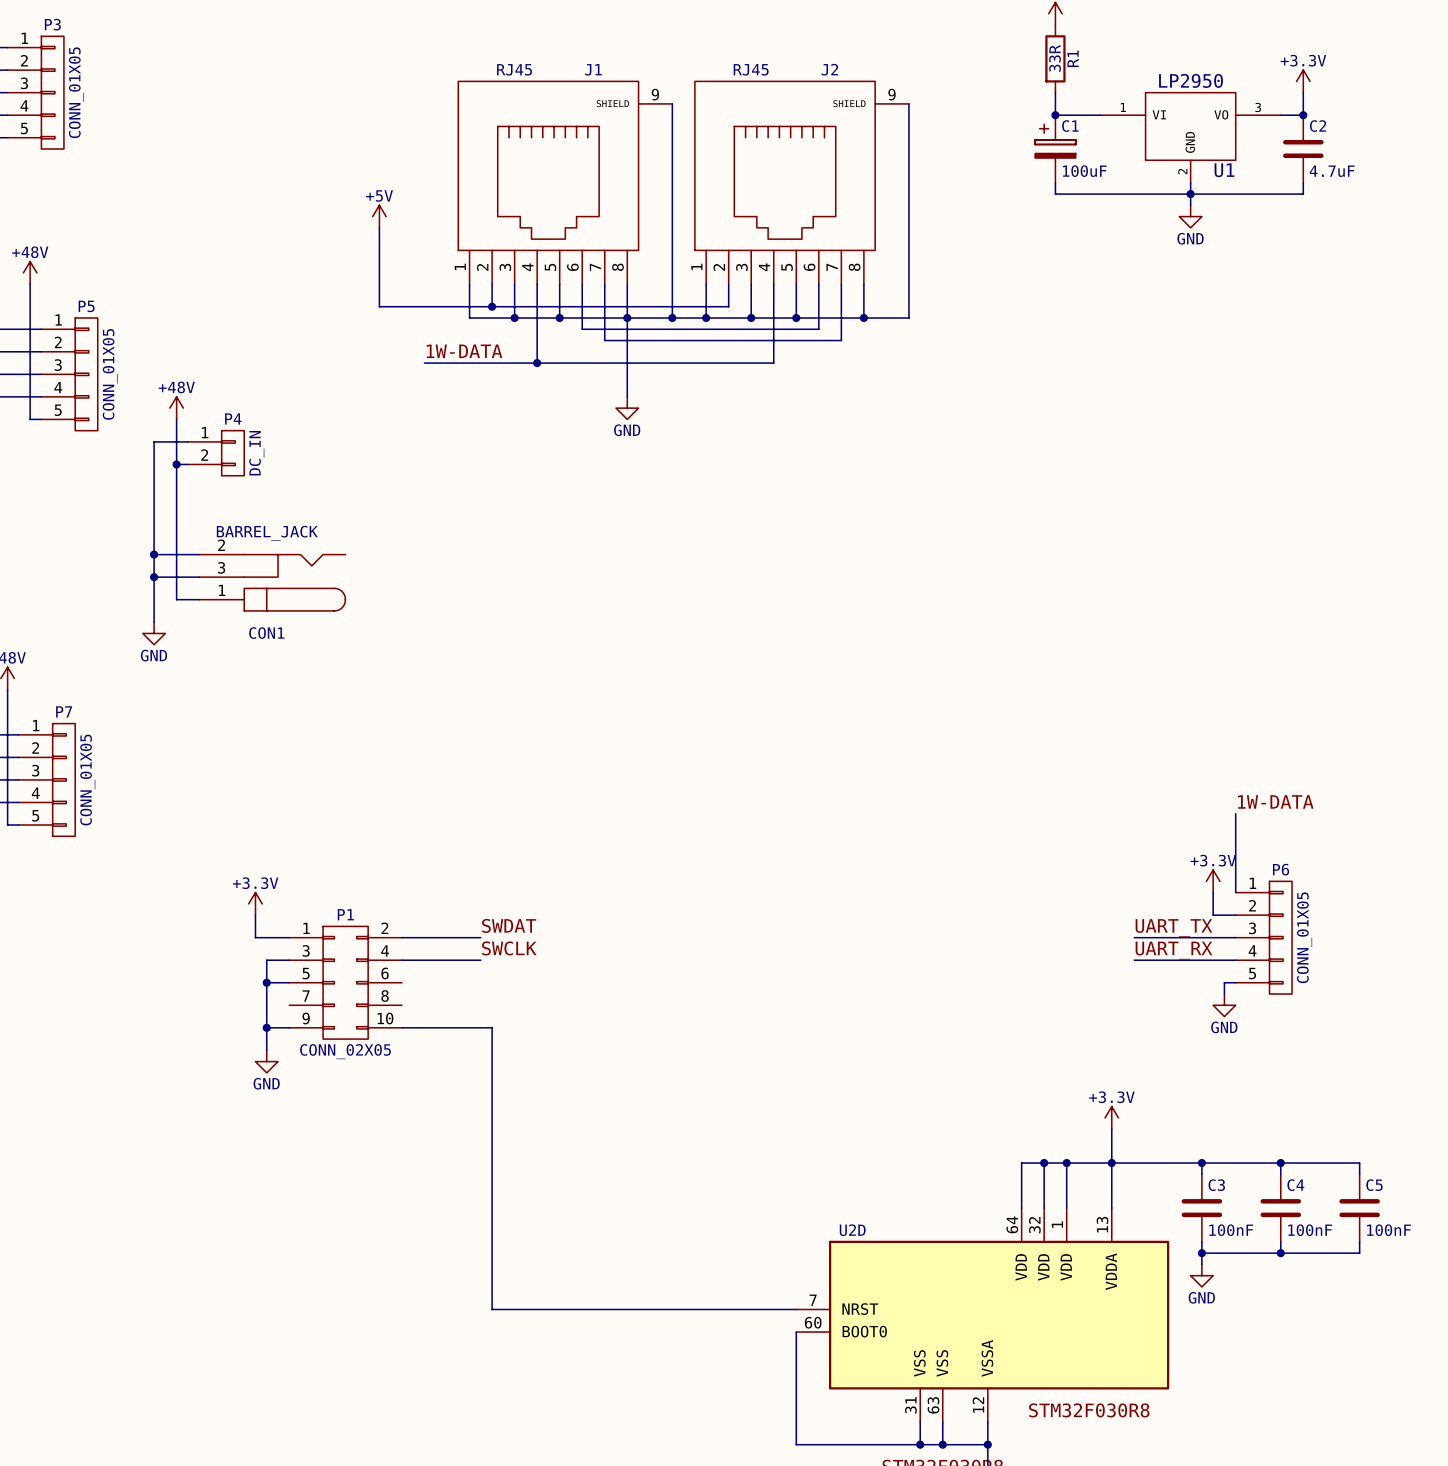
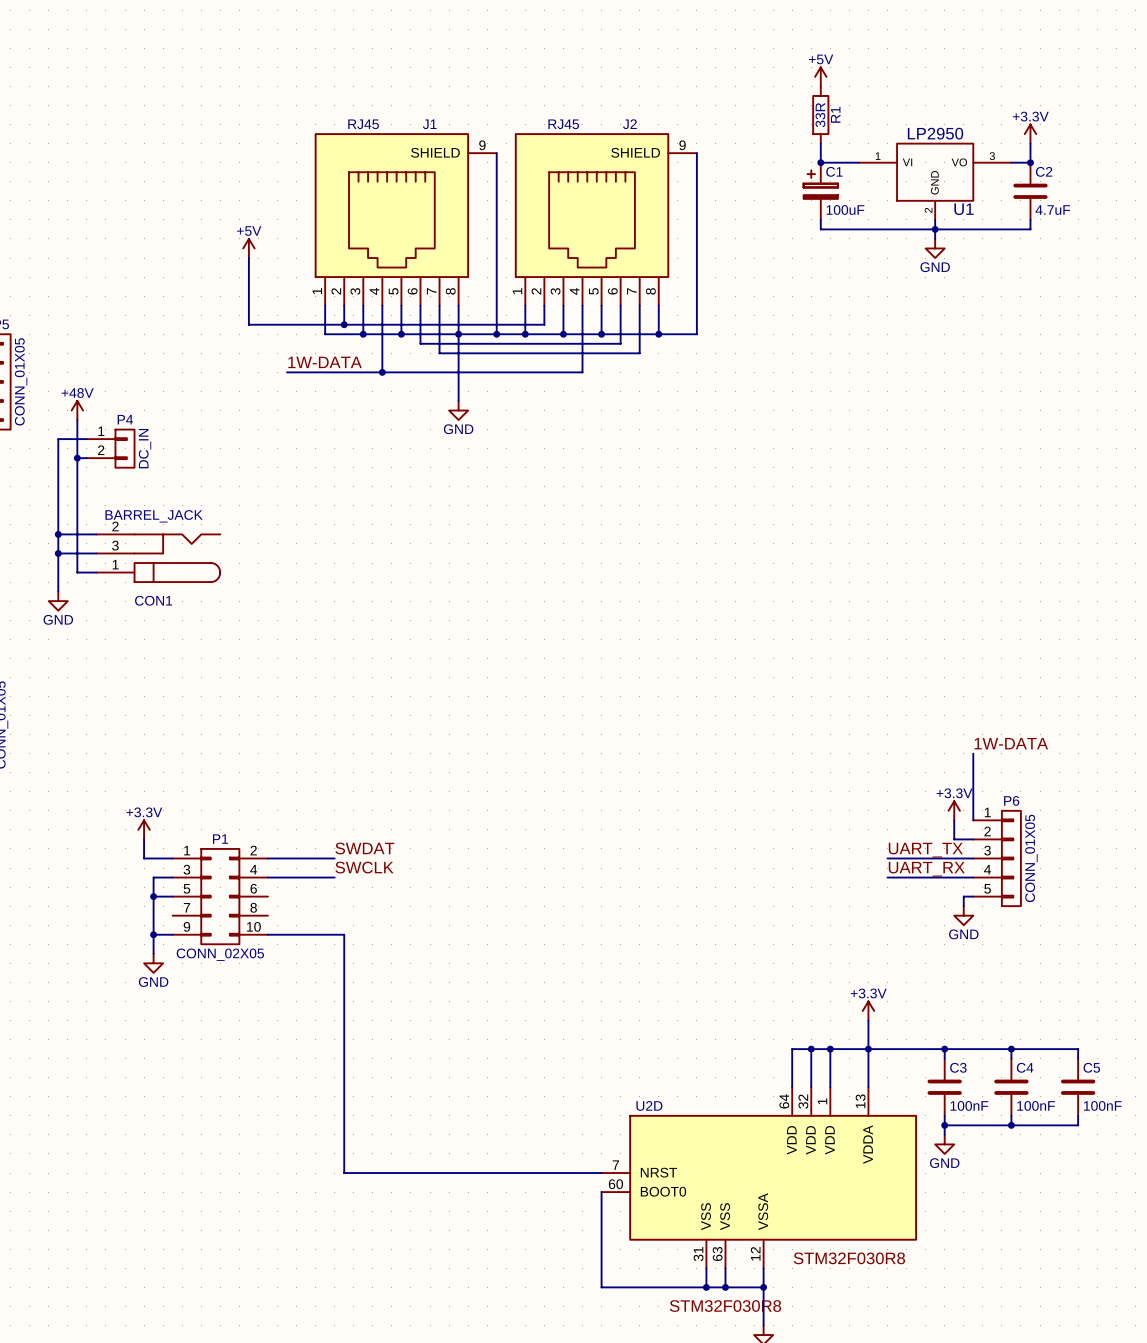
J1 symbol: [458, 81, 673, 285] -> [314, 133, 497, 306]
J2 symbol: [694, 81, 909, 285] -> [514, 133, 697, 306]

